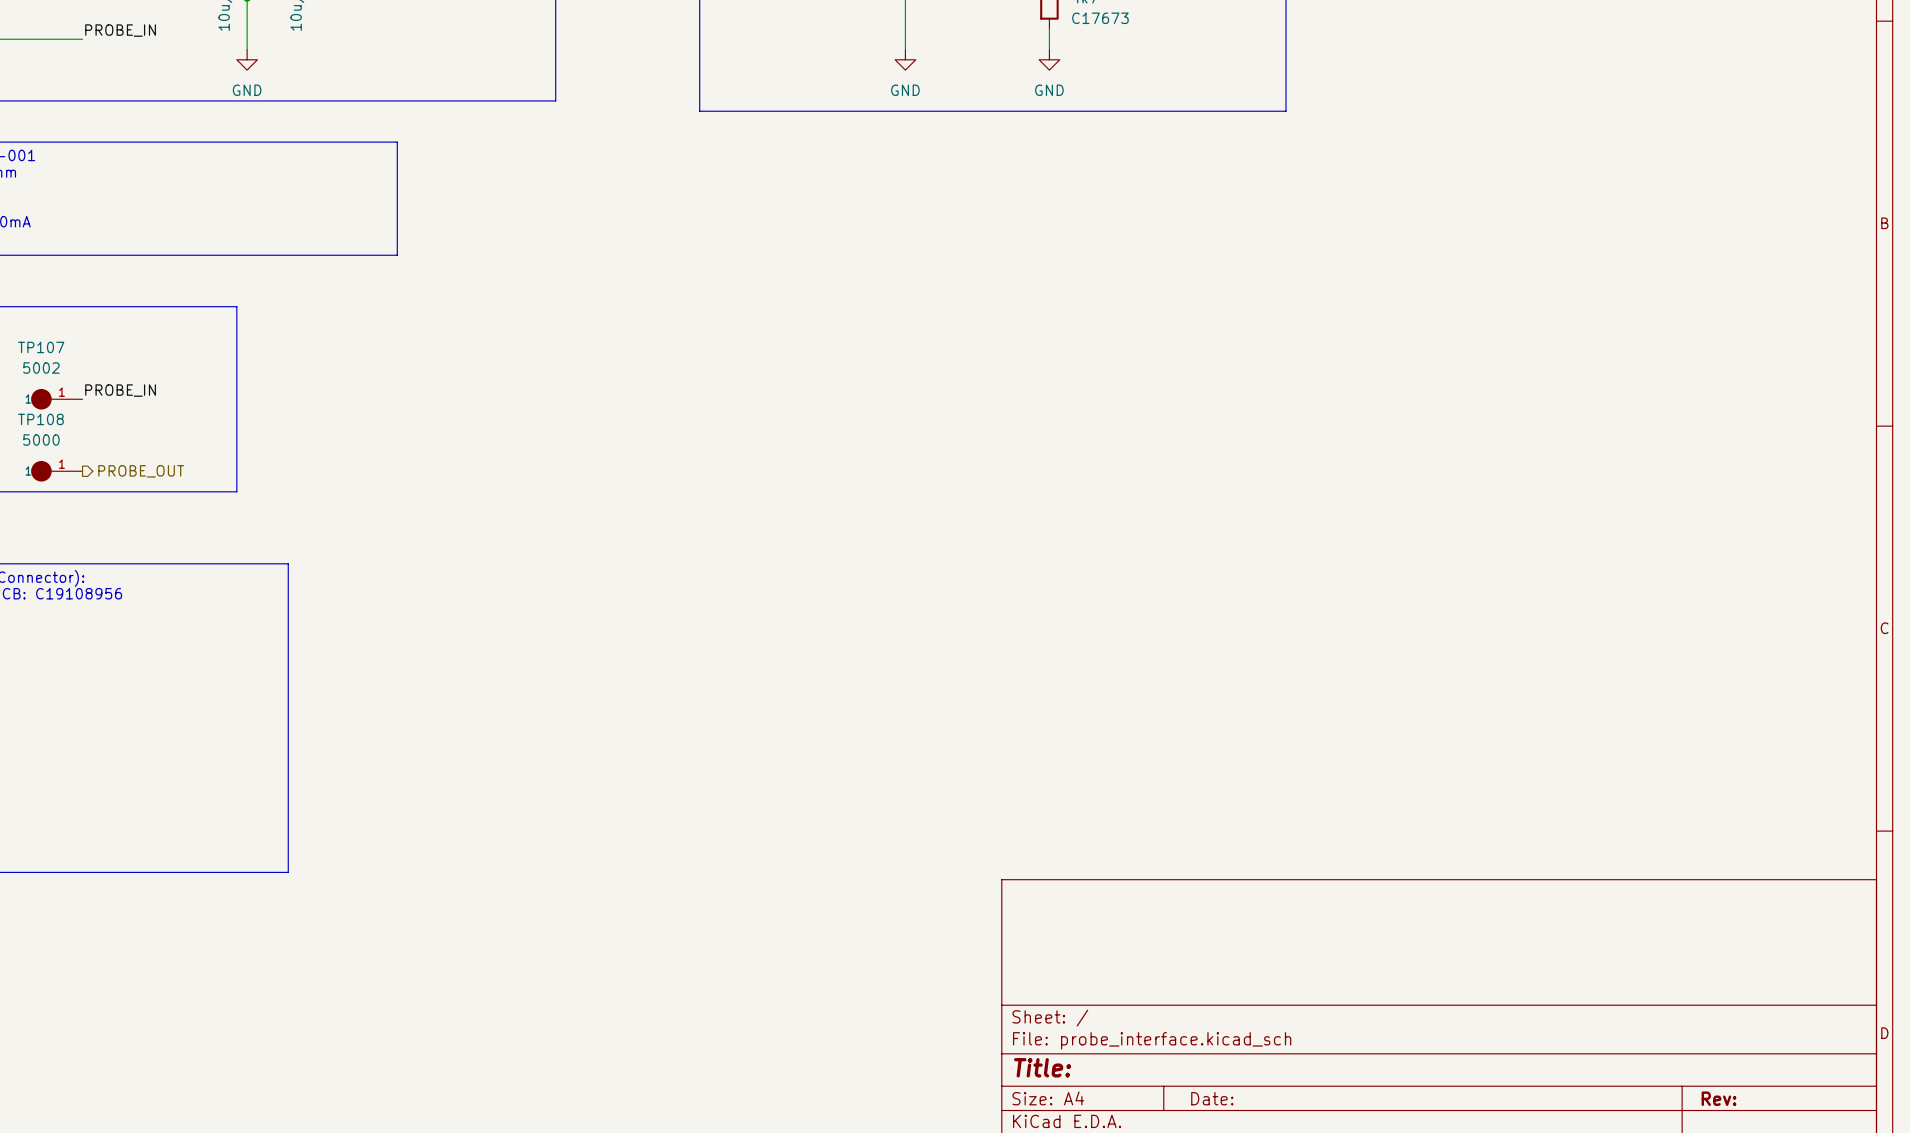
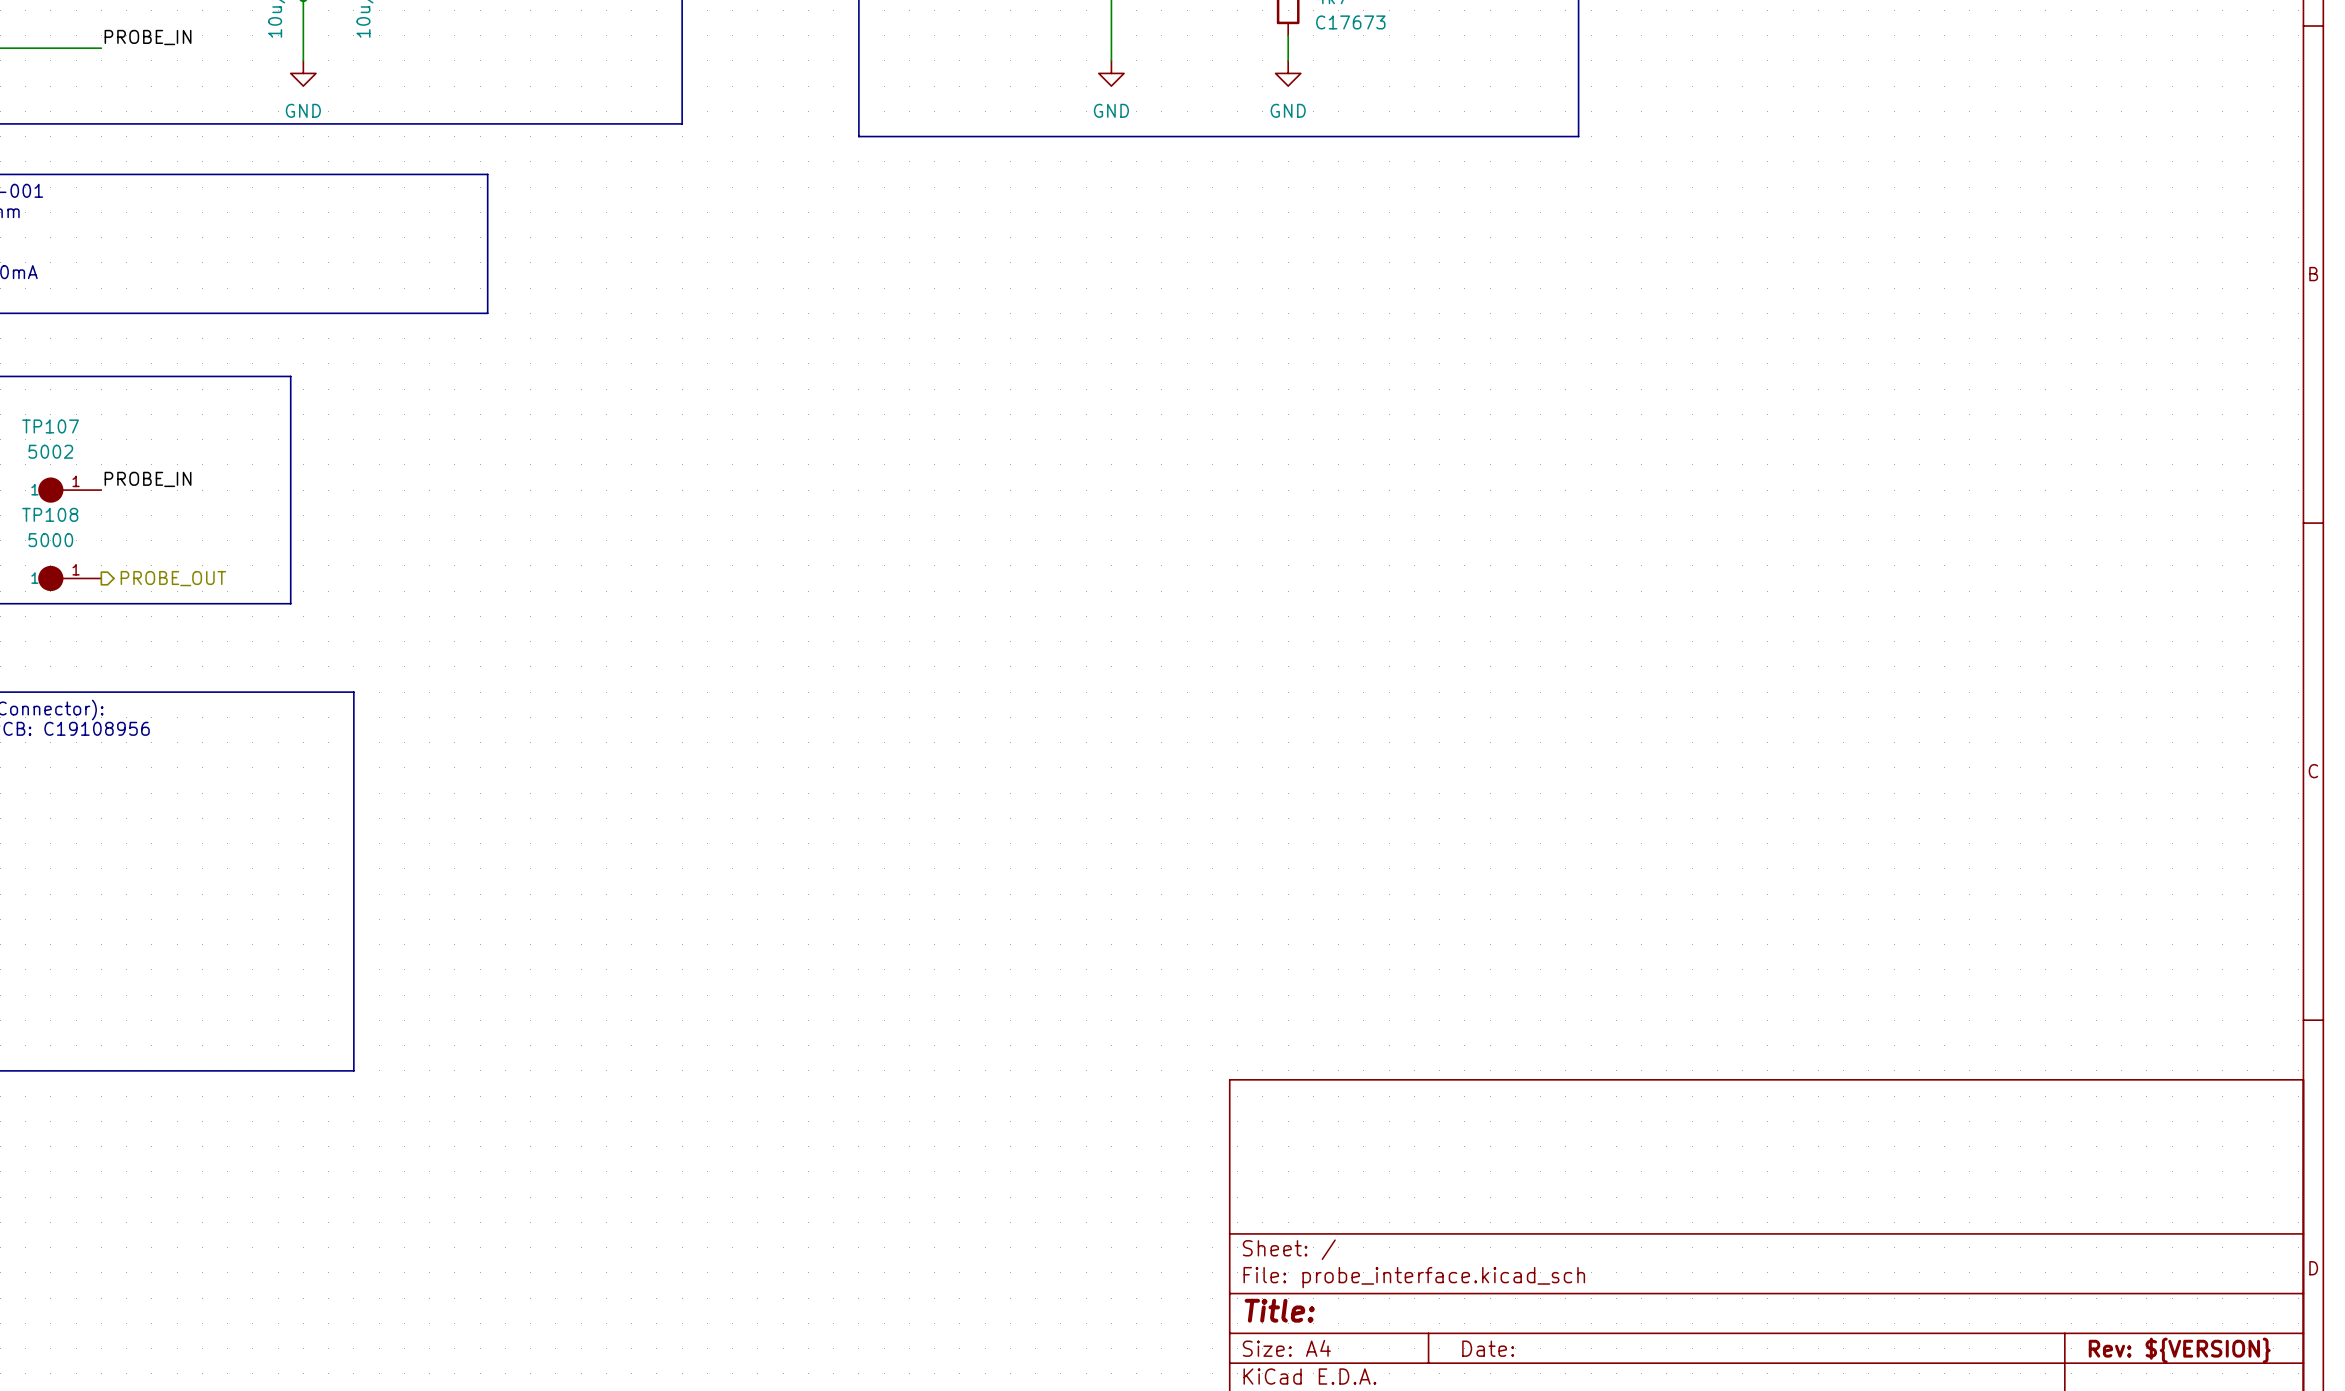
title block: Rev: (1719, 1098) -> Rev: ${VERSION} (2179, 1350)

